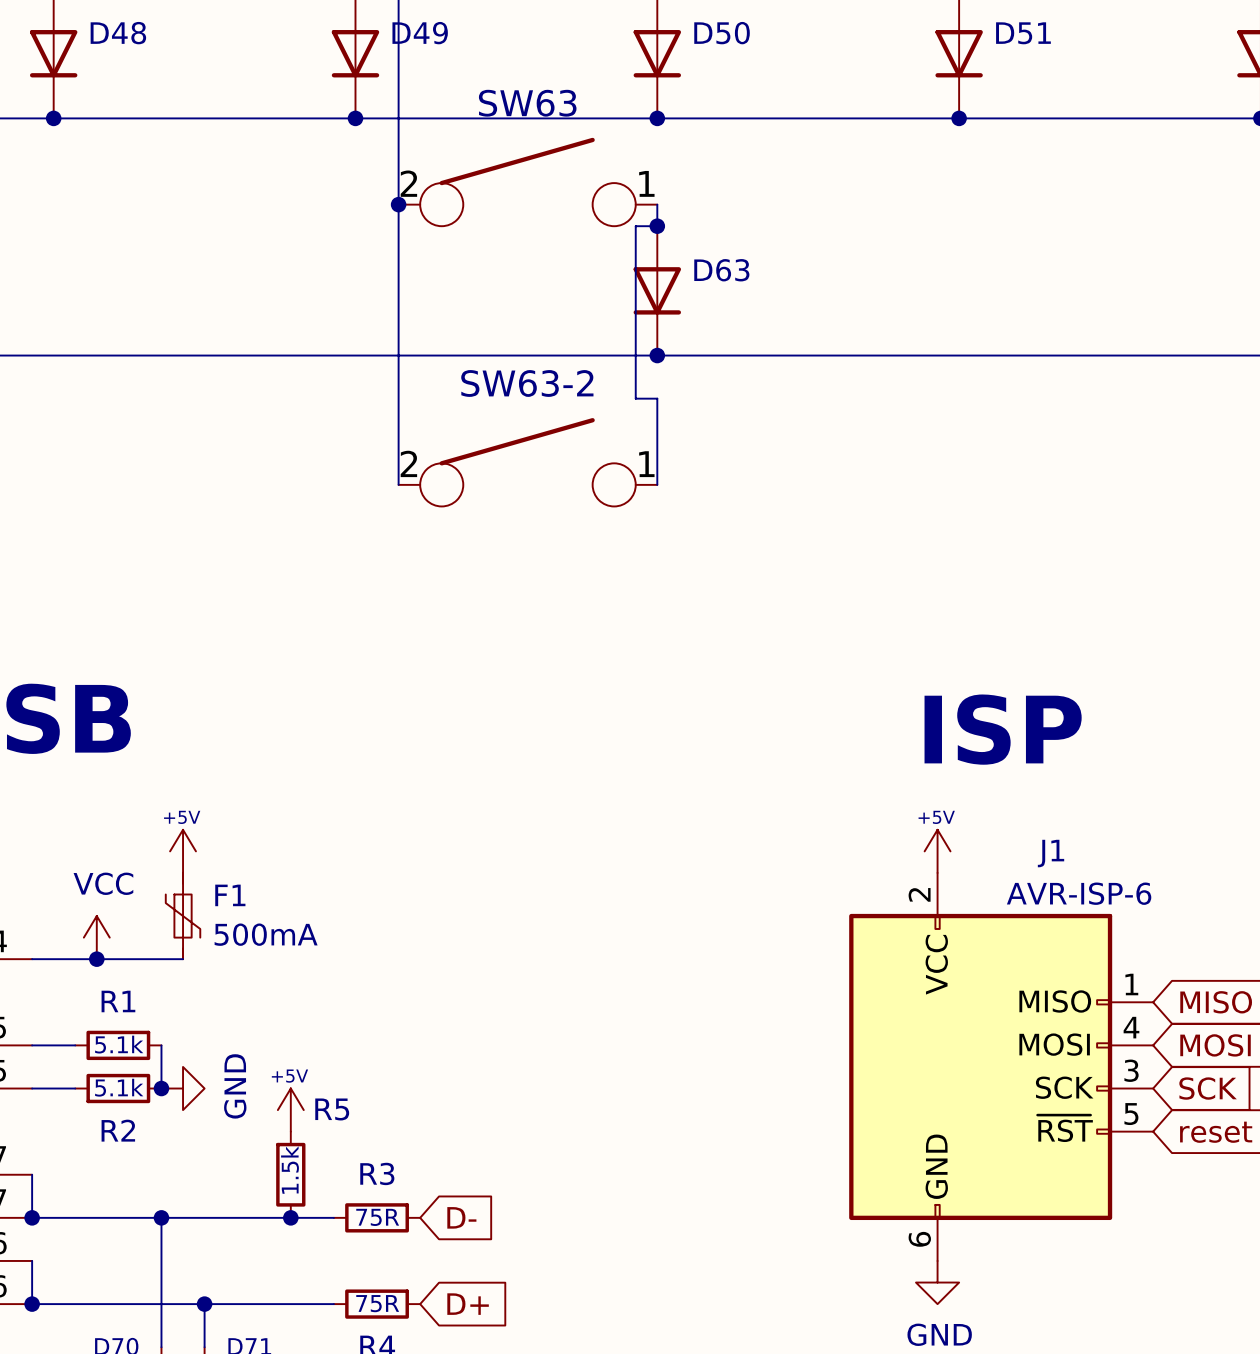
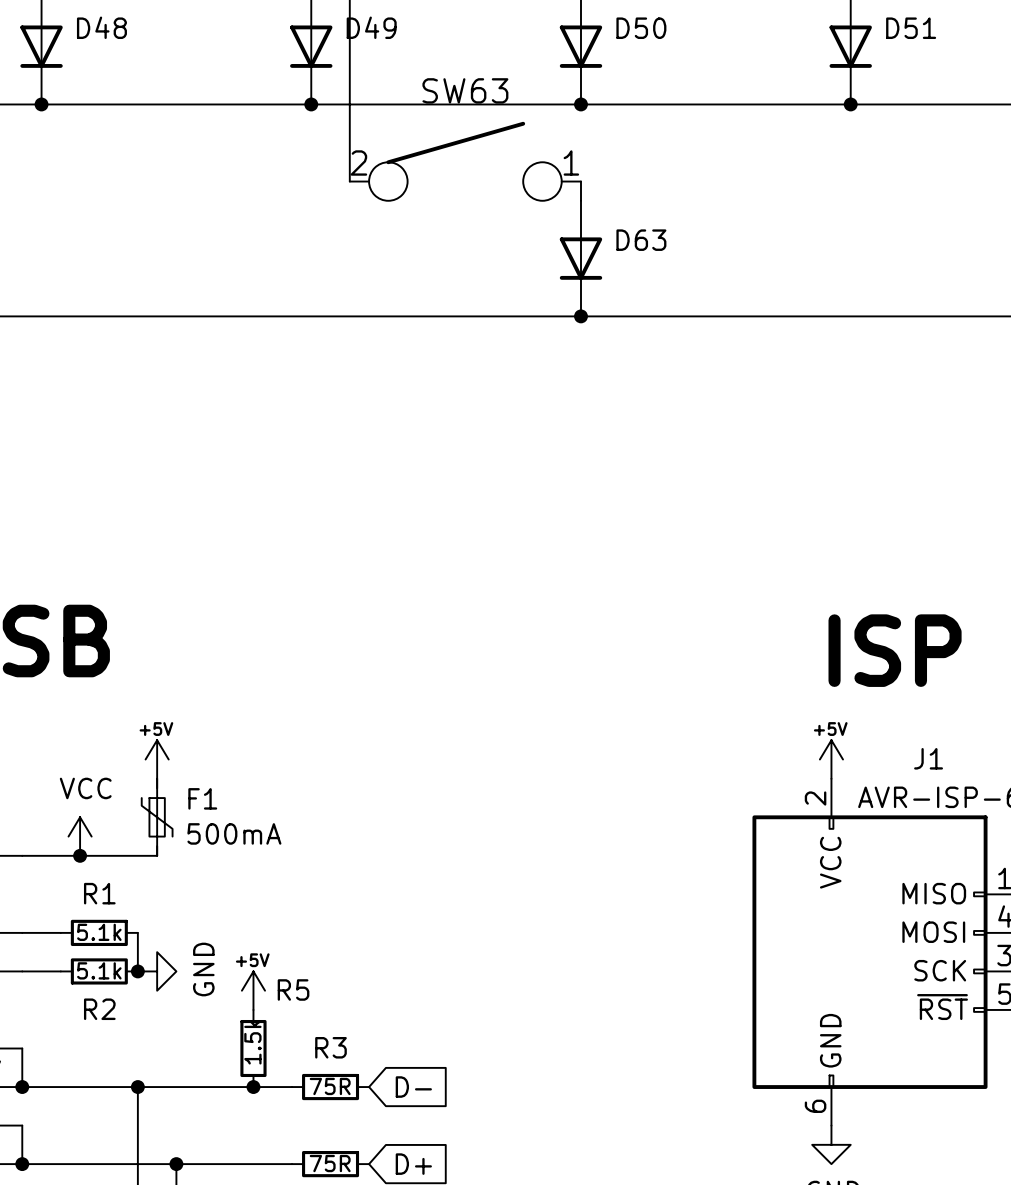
wire: (398, 204) (398, 484) -> none
junction: (398, 204) -> none
wire: (657, 226) (635, 226) (635, 398) (657, 398) (657, 484) -> none
junction: (657, 226) -> none
SW63-2: (527, 462) -> none

